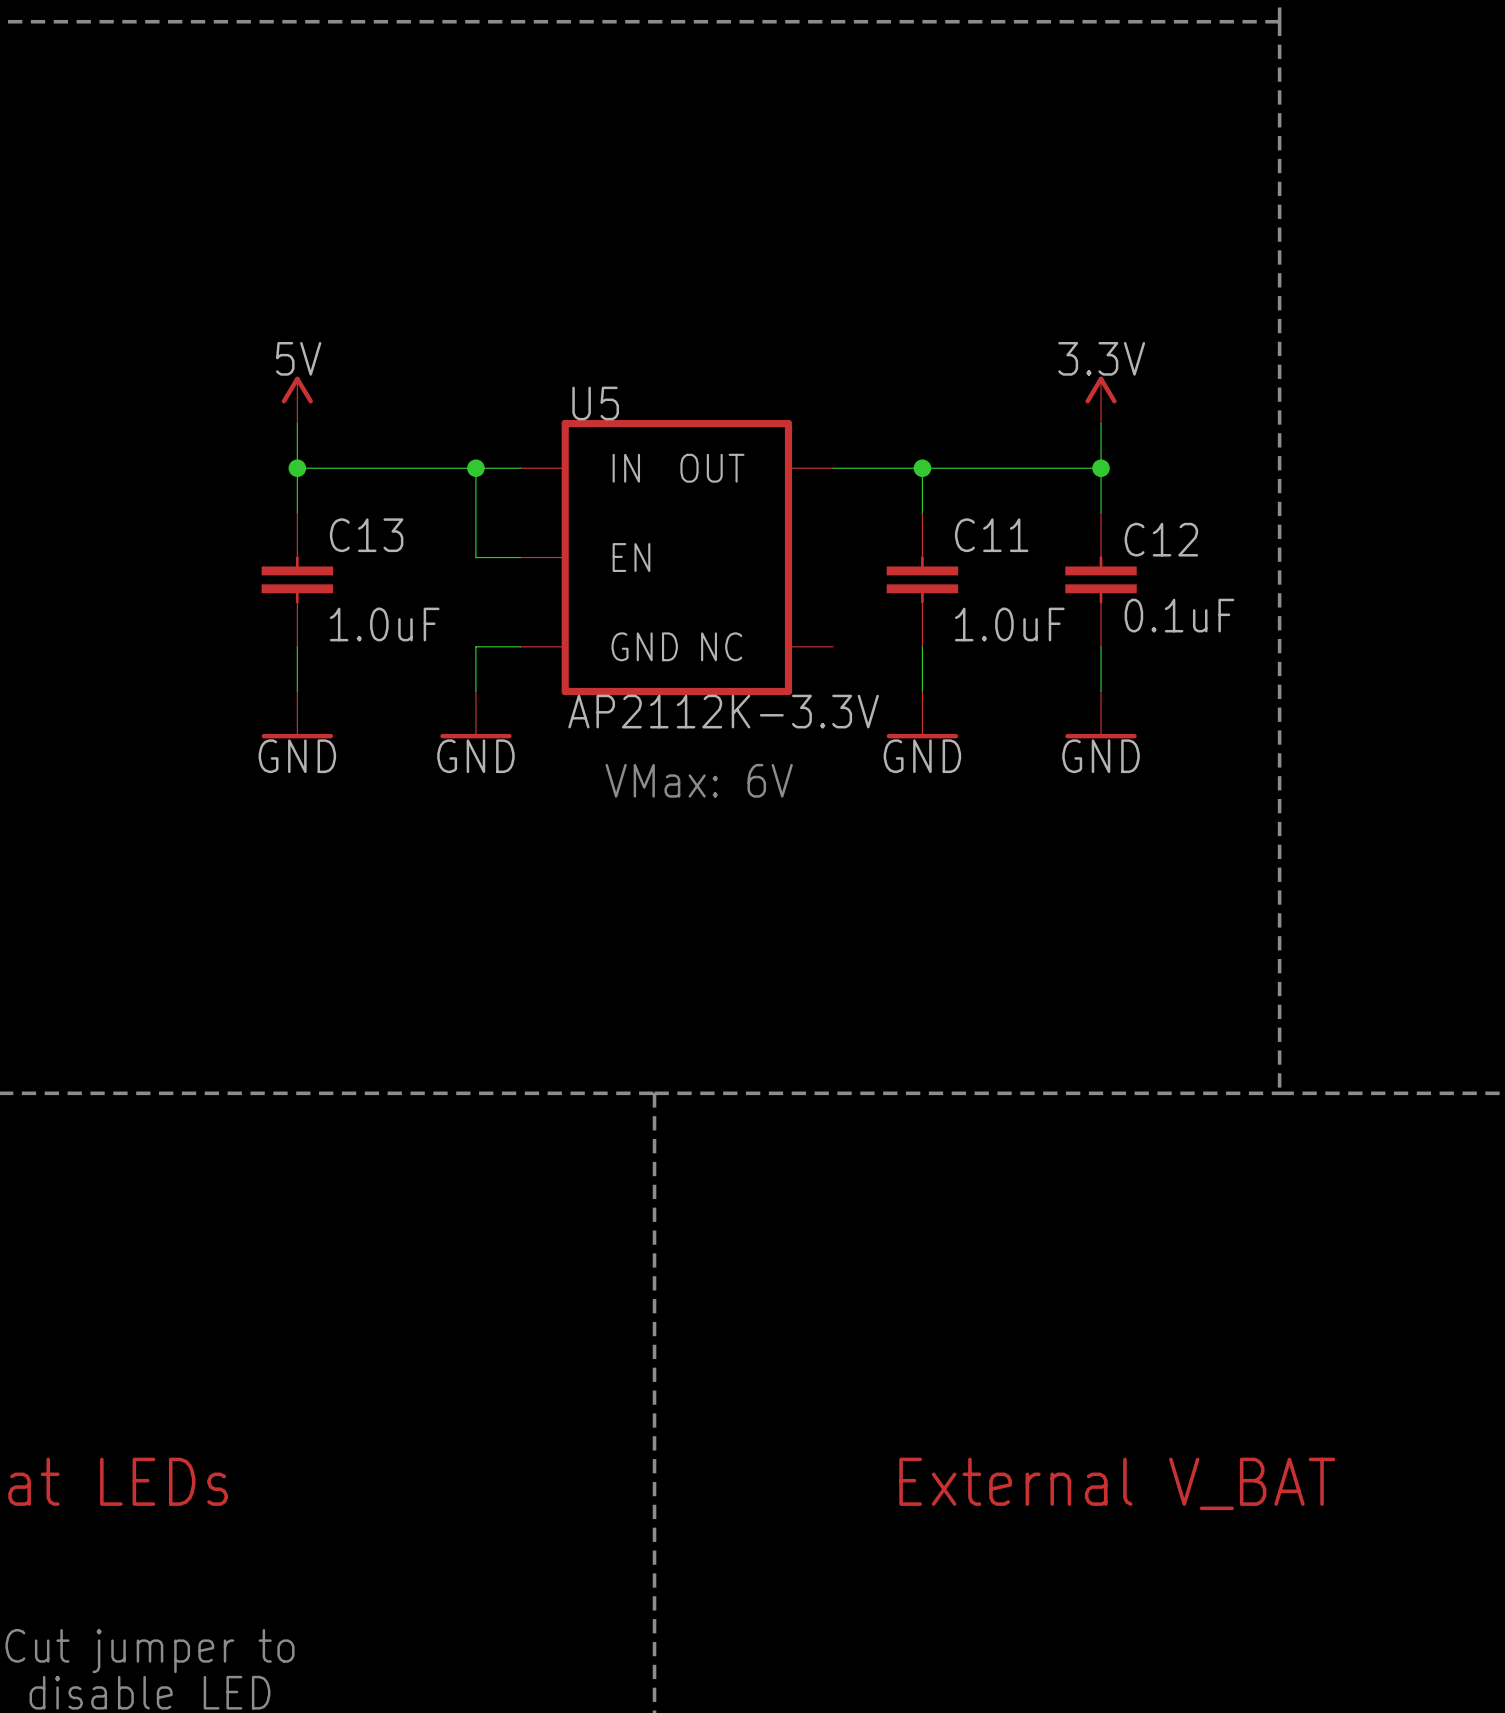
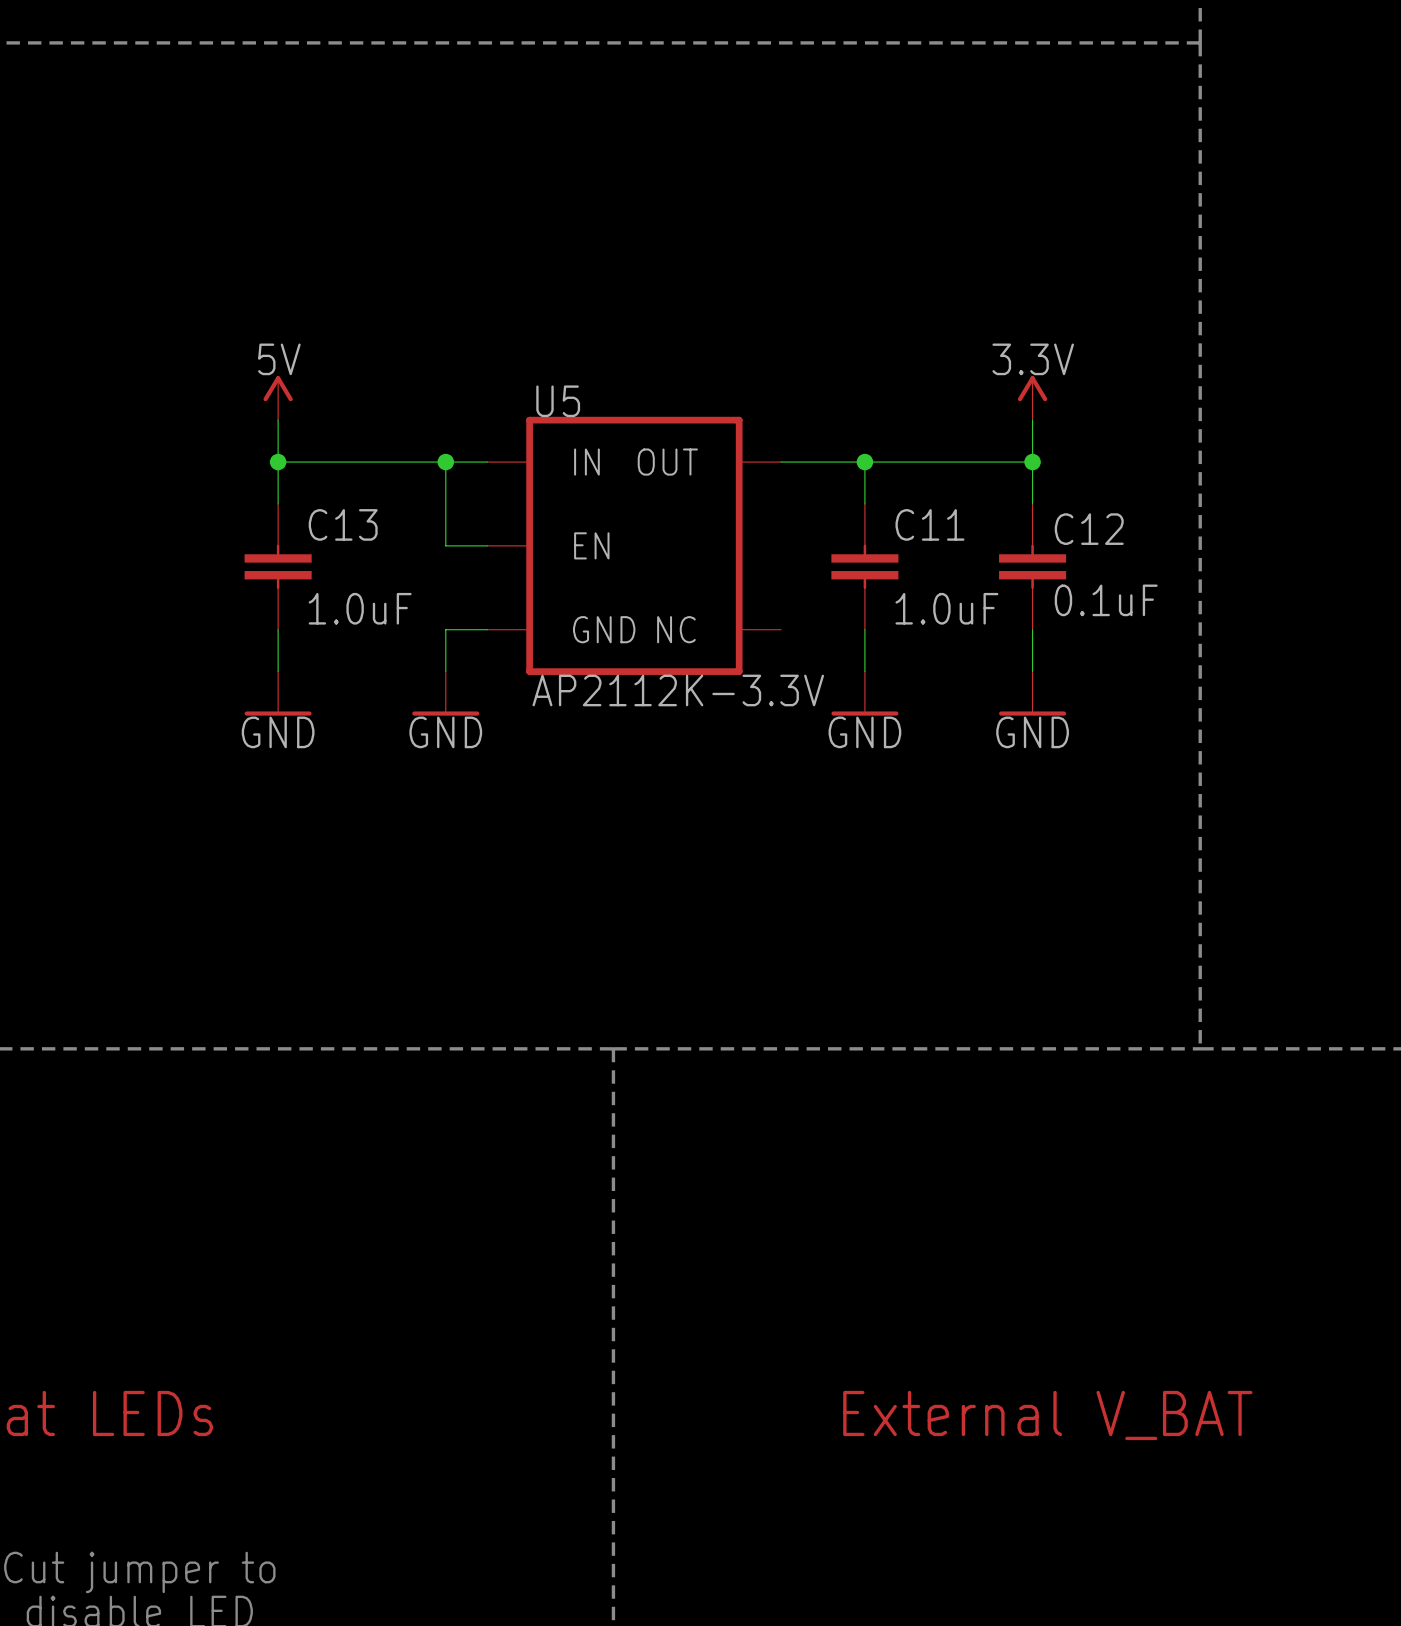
text: VMax: 6V (699, 780) -> none

